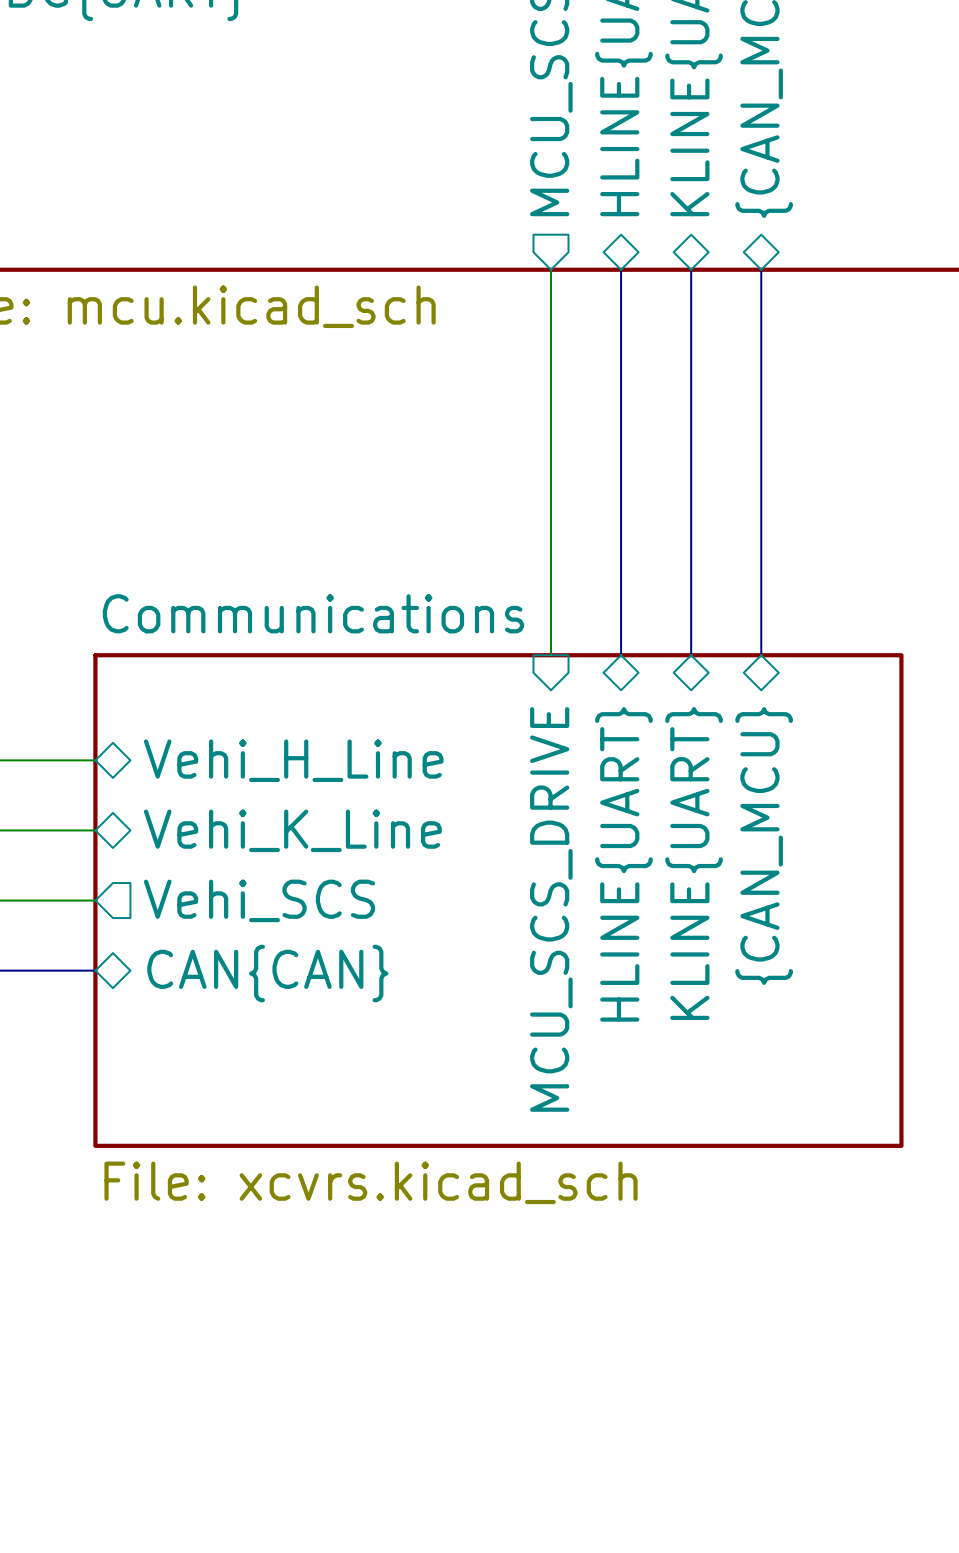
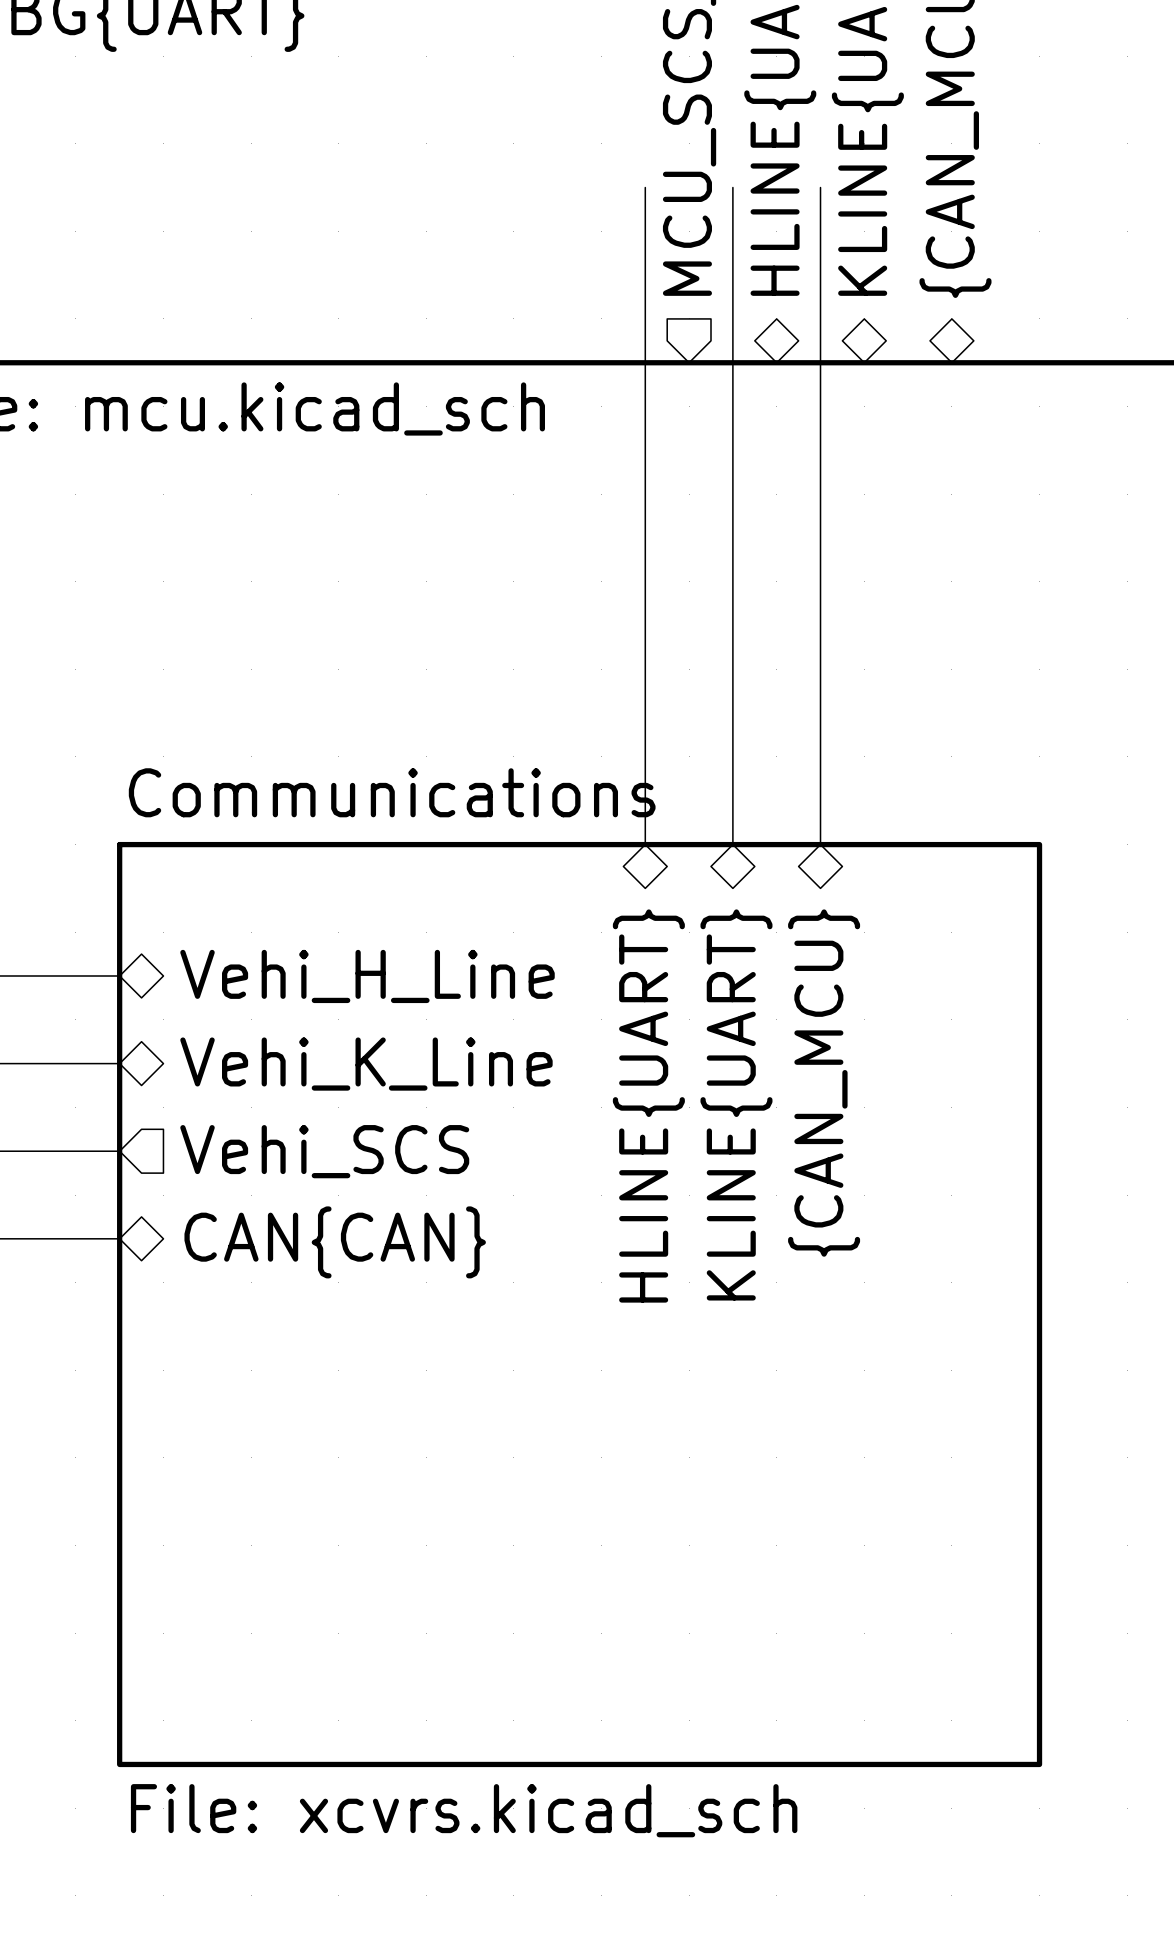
bus: none -> (645, 187) (645, 844)
bus: none -> (732, 187) (732, 844)
bus: none -> (820, 187) (820, 844)
wire: (550, 269) (550, 655) -> none
bus: (621, 269) (621, 655) -> none
bus: (691, 269) (691, 655) -> none
bus: (761, 269) (761, 655) -> none
sheet pin position: {CAN_MCU} (764, 846) -> {CAN_MCU} (824, 1083)
sheet pin position: KLINE{UART} (694, 863) -> KLINE{UART} (736, 1104)
sheet pin position: HLINE{UART} (623, 864) -> HLINE{UART} (648, 1106)
sheet Communications: File: xcvrs.kicad_sch (498, 900) -> none
sheet pin: MCU_SCS_DRIVE (551, 909) -> none
sheet Communications: none -> File: xcvrs.kicad_sch (579, 1304)

